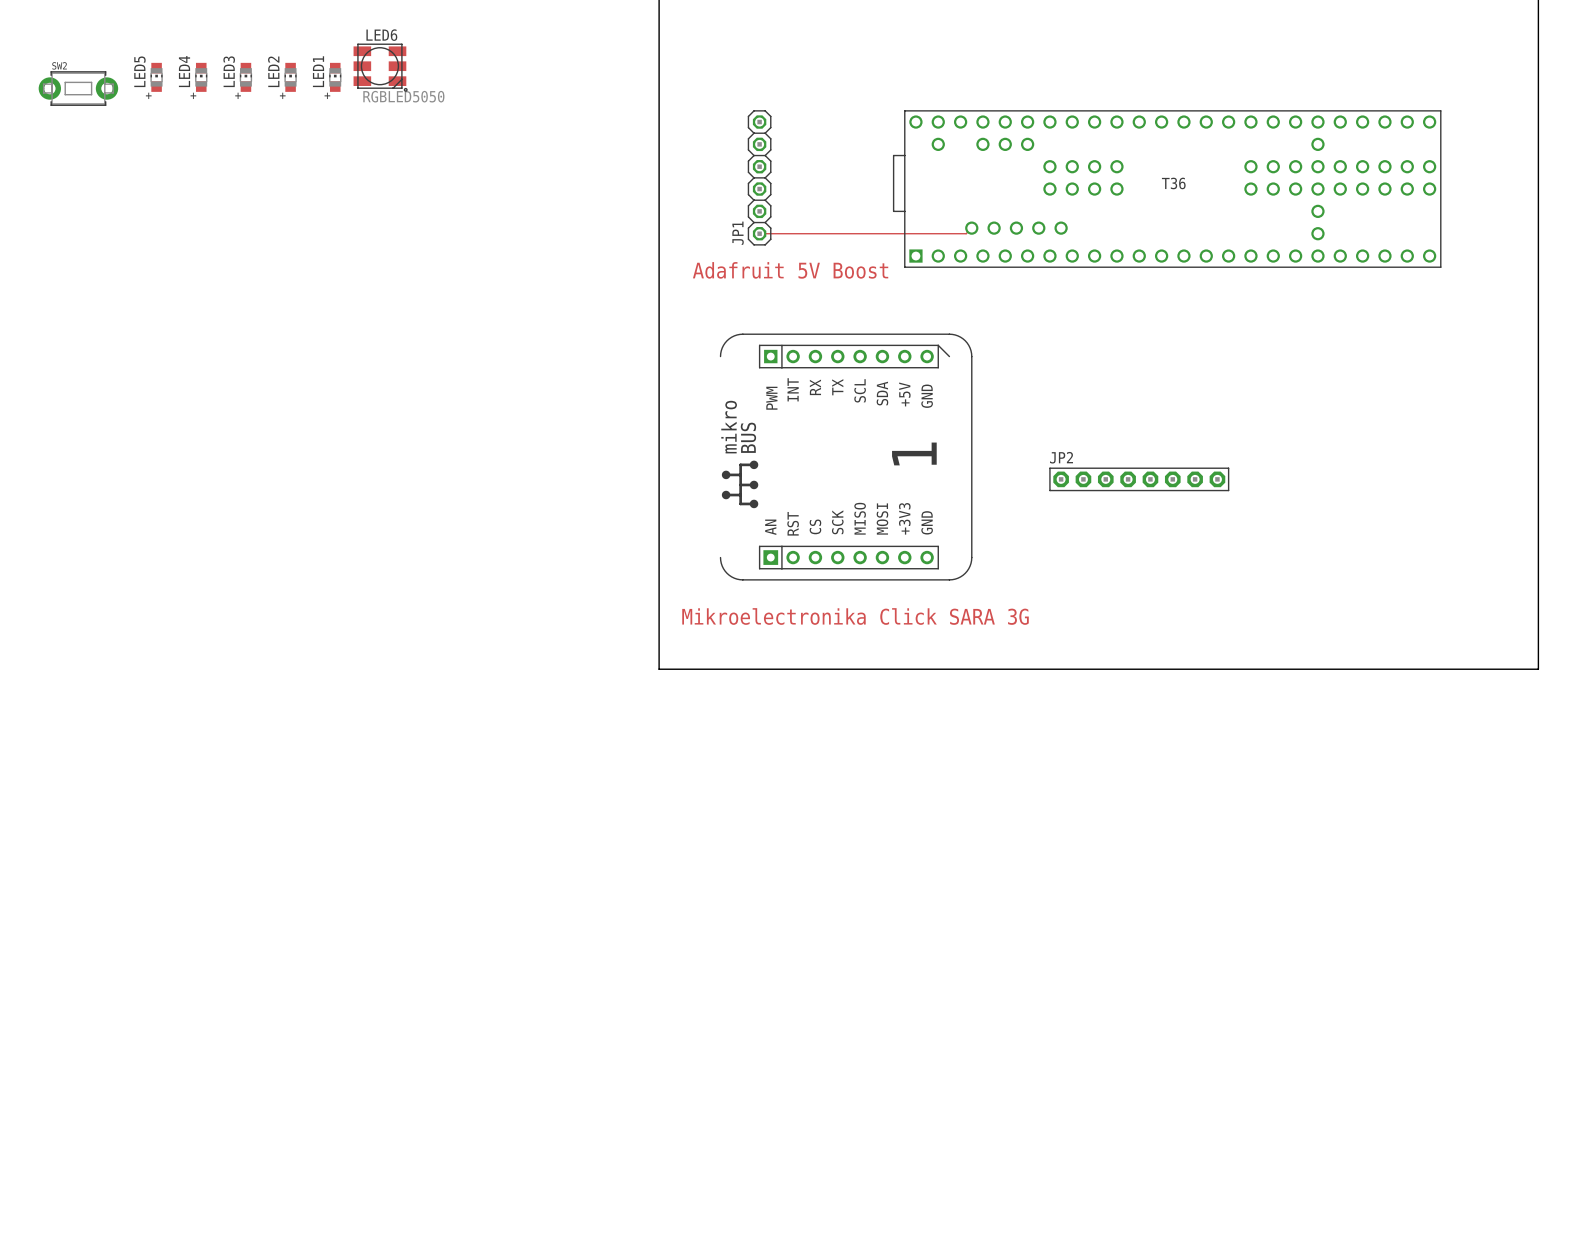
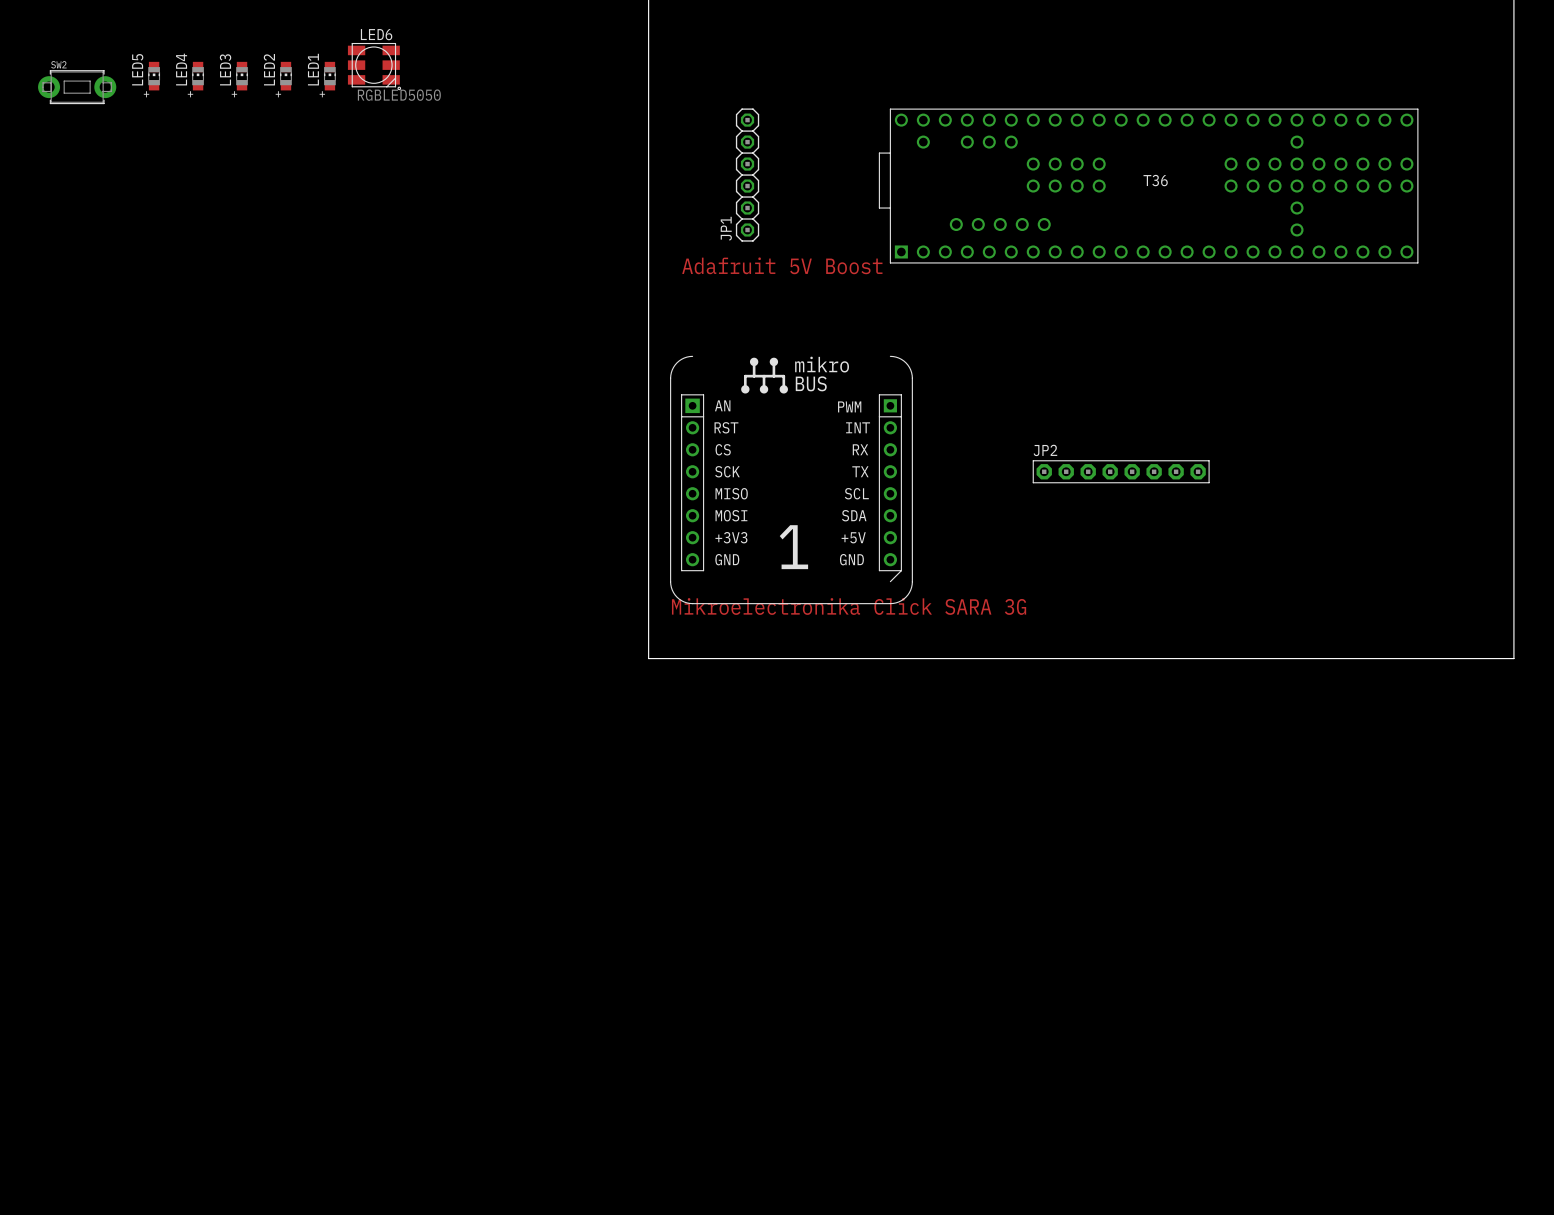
top track: (971, 228) (966, 233) (759, 233) -> none
part rotation: 0° (846, 457) -> 90° clockwise (791, 480)

